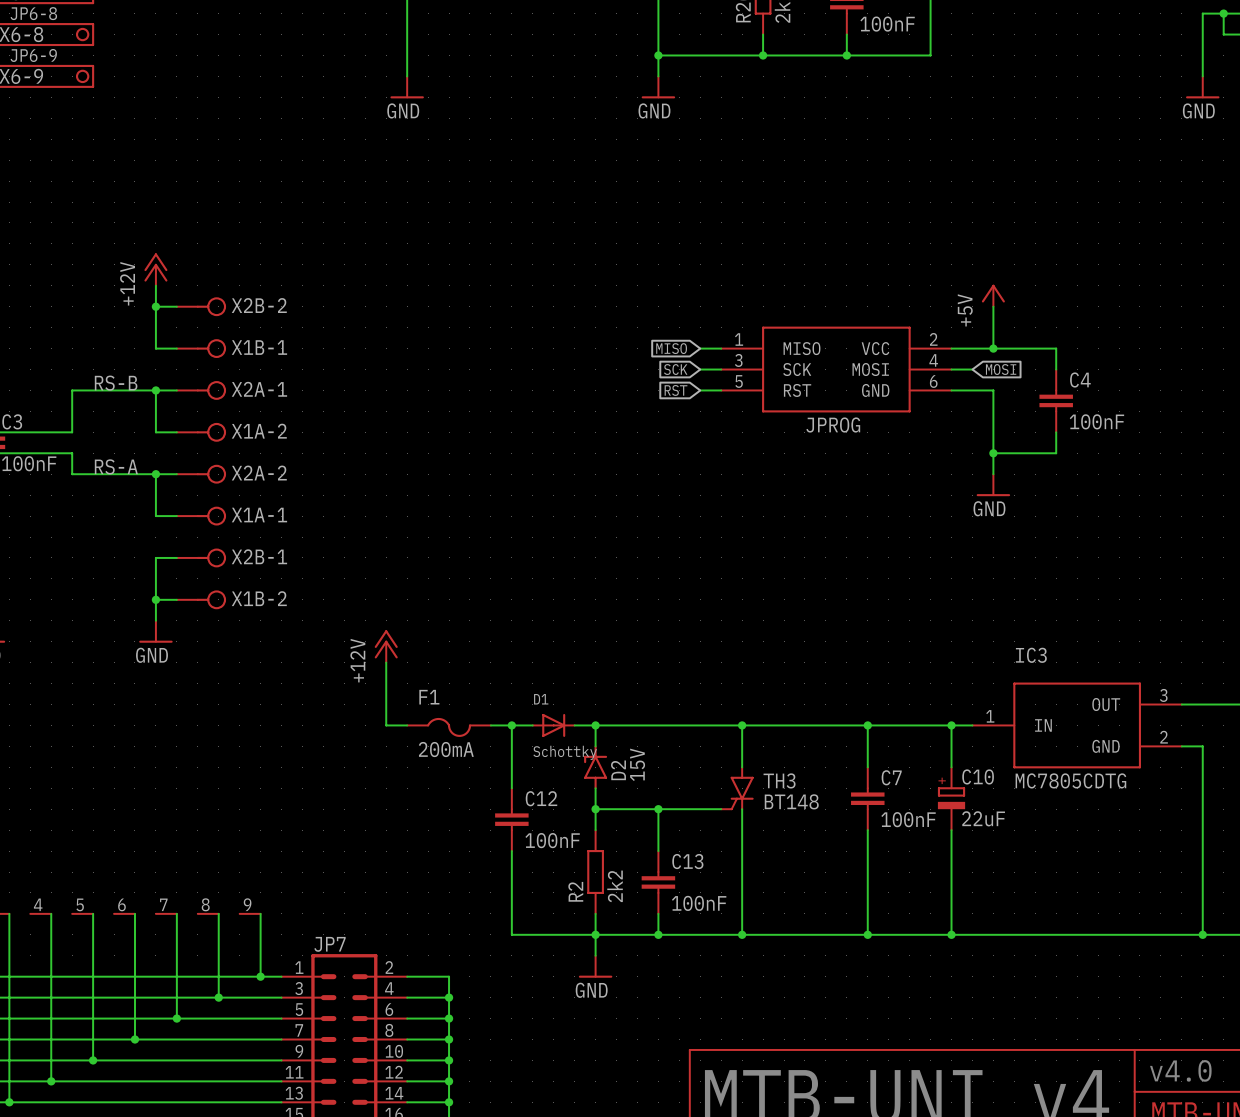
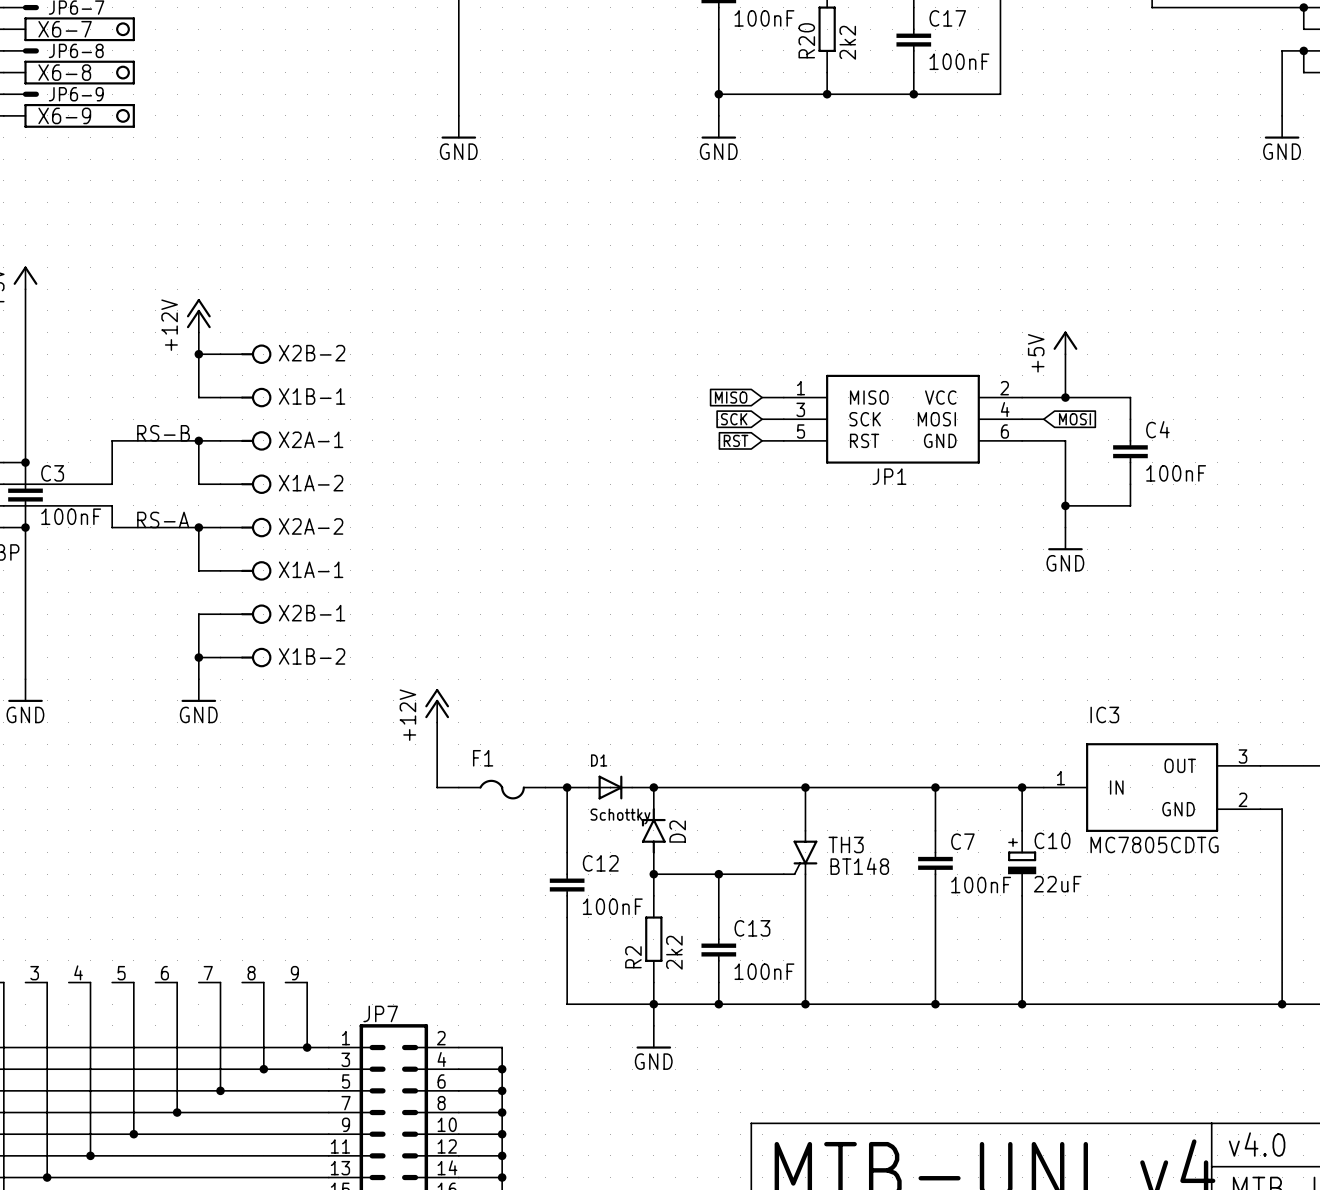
JPROG name: JPROG (833, 425) -> JP1 (889, 476)
F1 value: 200mA (446, 749) -> none
D2 value: 15V (637, 764) -> none

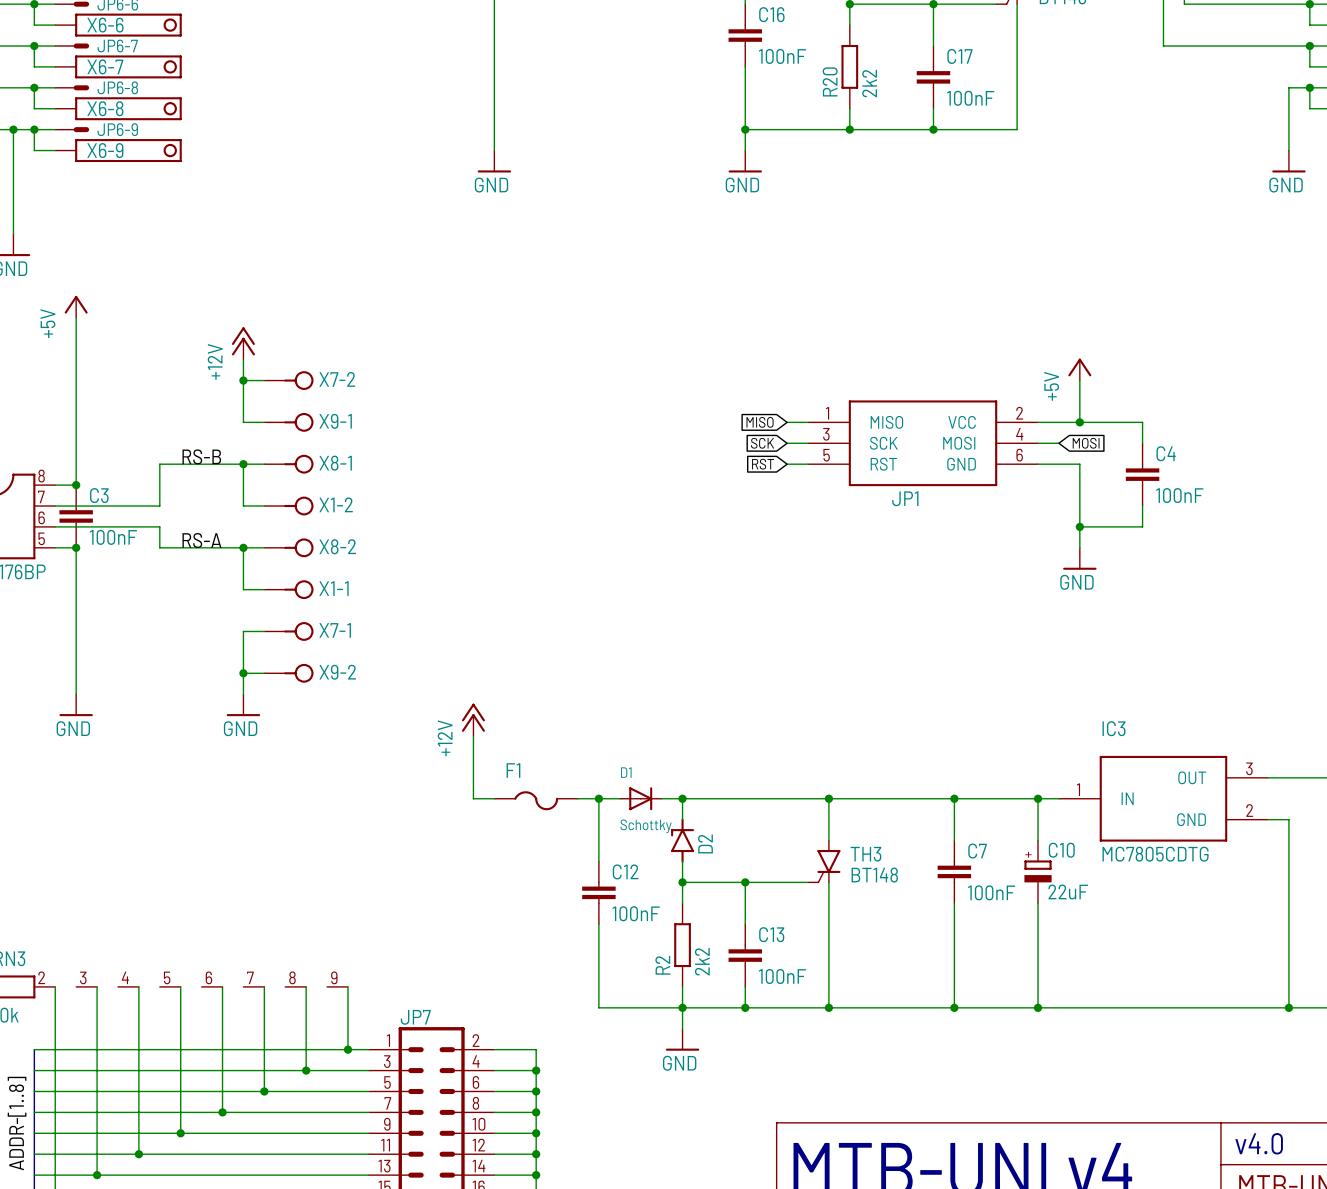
X2B-2 name: X2B-2 (312, 353) -> X7-2 (337, 379)
X1B-1 name: X1B-1 (312, 396) -> X9-1 (335, 421)
X2A-1 name: X2A-1 (311, 439) -> X8-1 (335, 463)
X1A-2 name: X1A-2 (311, 483) -> X1-2 (336, 504)
X2A-2 name: X2A-2 (311, 526) -> X8-2 (337, 546)
X1A-1 name: X1A-1 (311, 569) -> X1-1 (334, 588)
X2B-1 name: X2B-1 (312, 613) -> X7-1 (335, 630)
X1B-2 name: X1B-2 (312, 656) -> X9-2 (337, 672)

